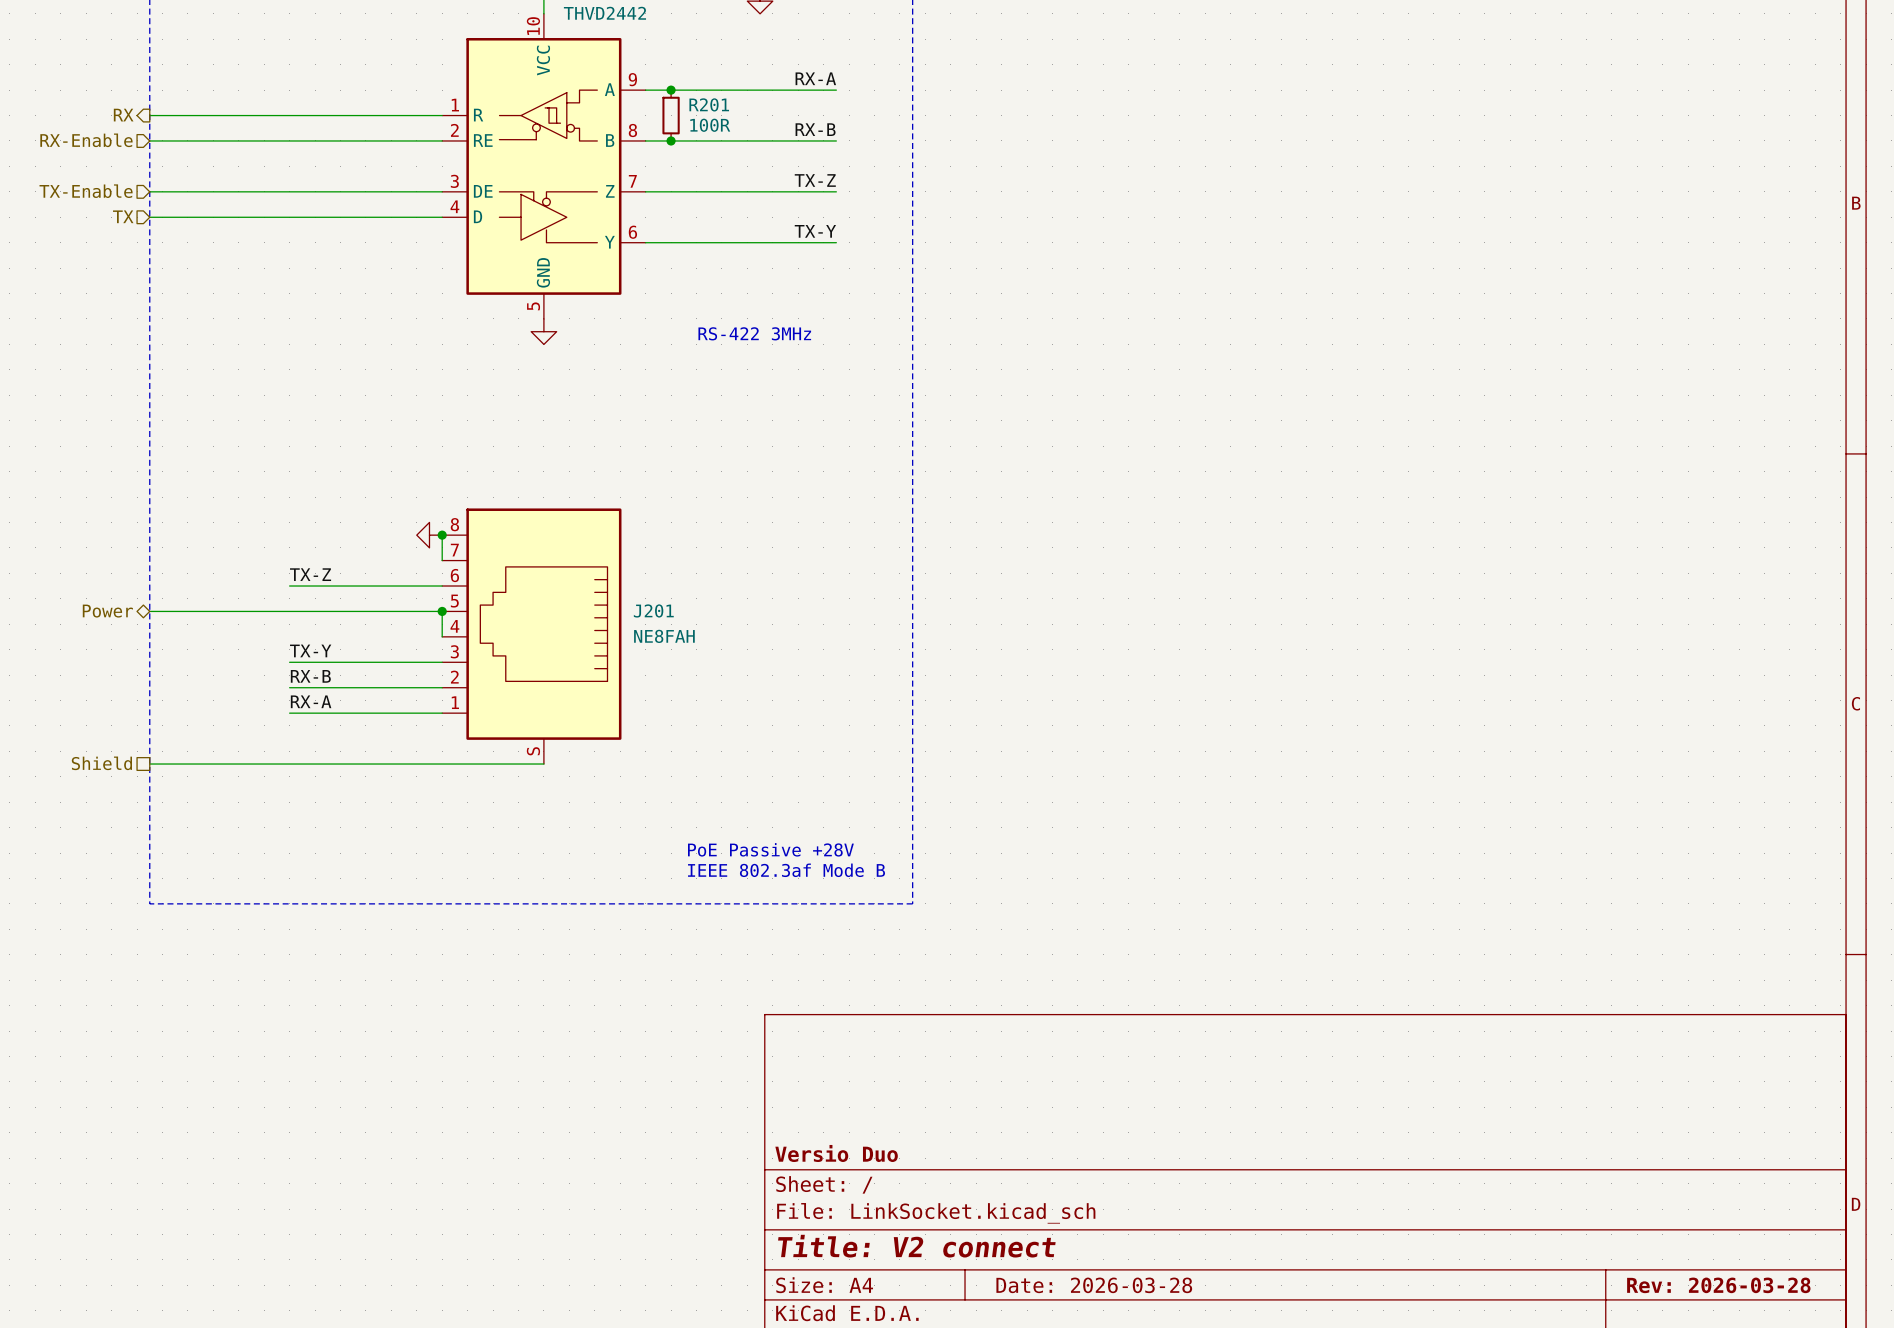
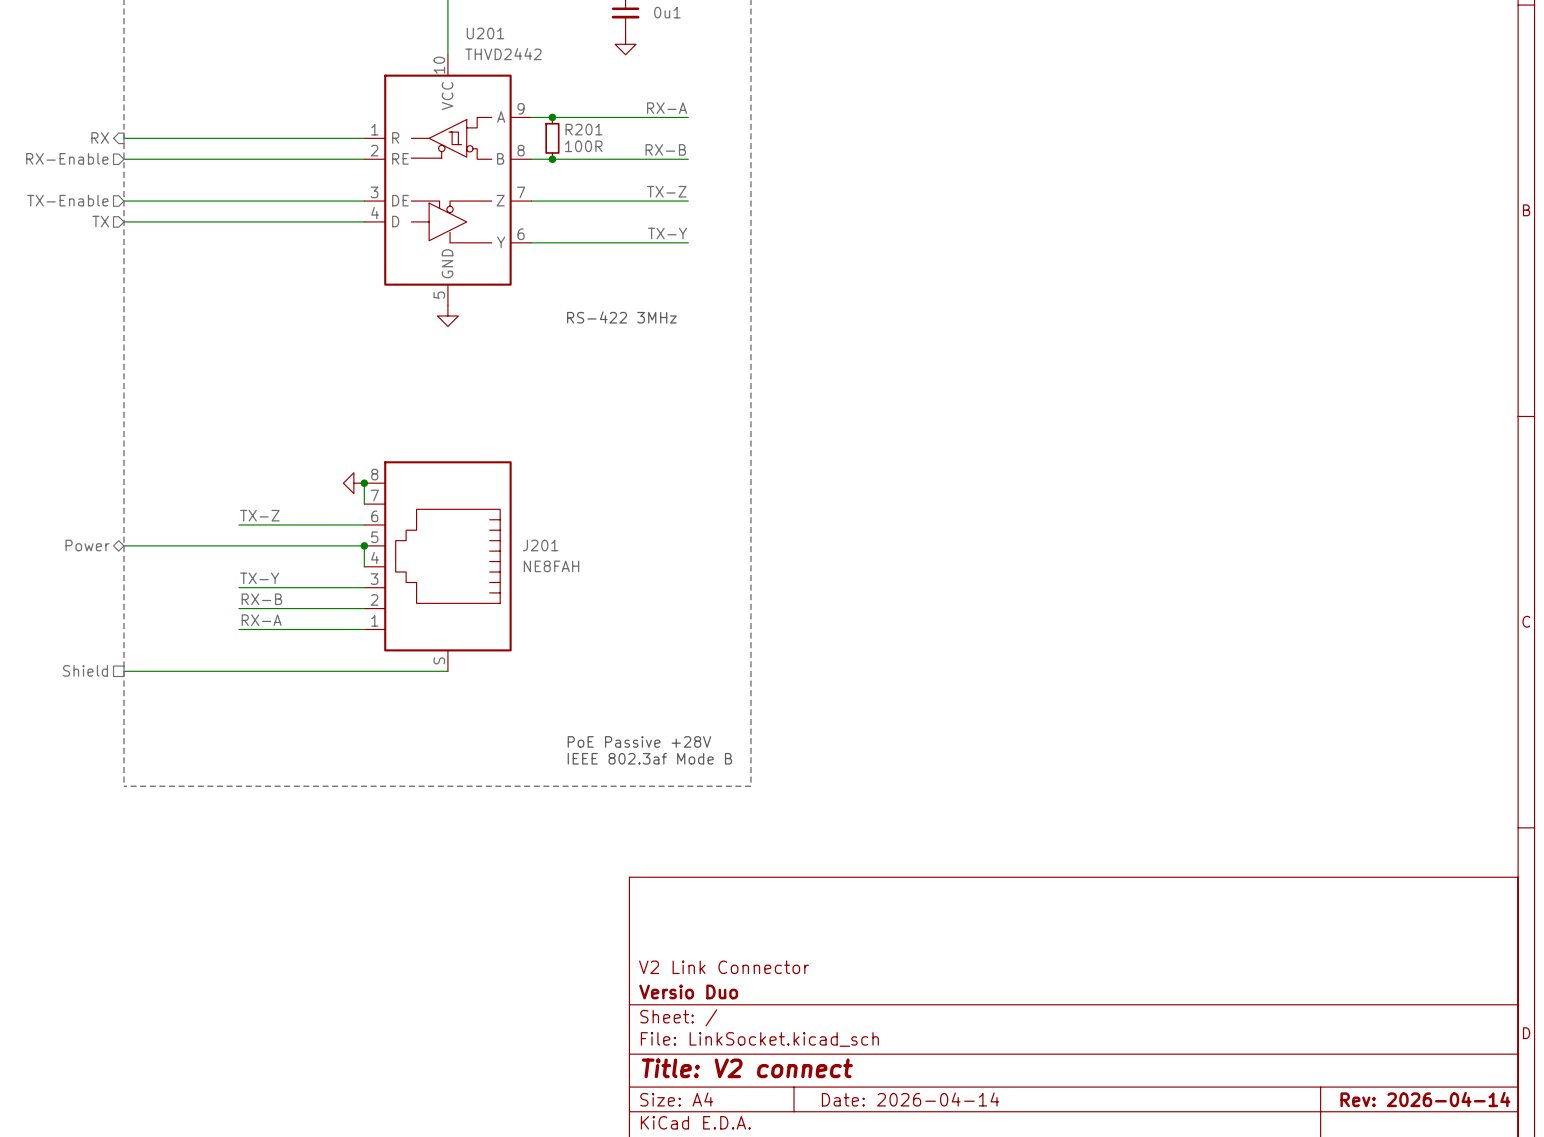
title block: none -> V2 Link Connector (724, 967)
title block: Date: 2026-03-28 (1094, 1285) -> Date: 2026-04-14 (910, 1099)
title block: Rev: 2026-03-28 (1718, 1285) -> Rev: 2026-04-14 (1425, 1099)

